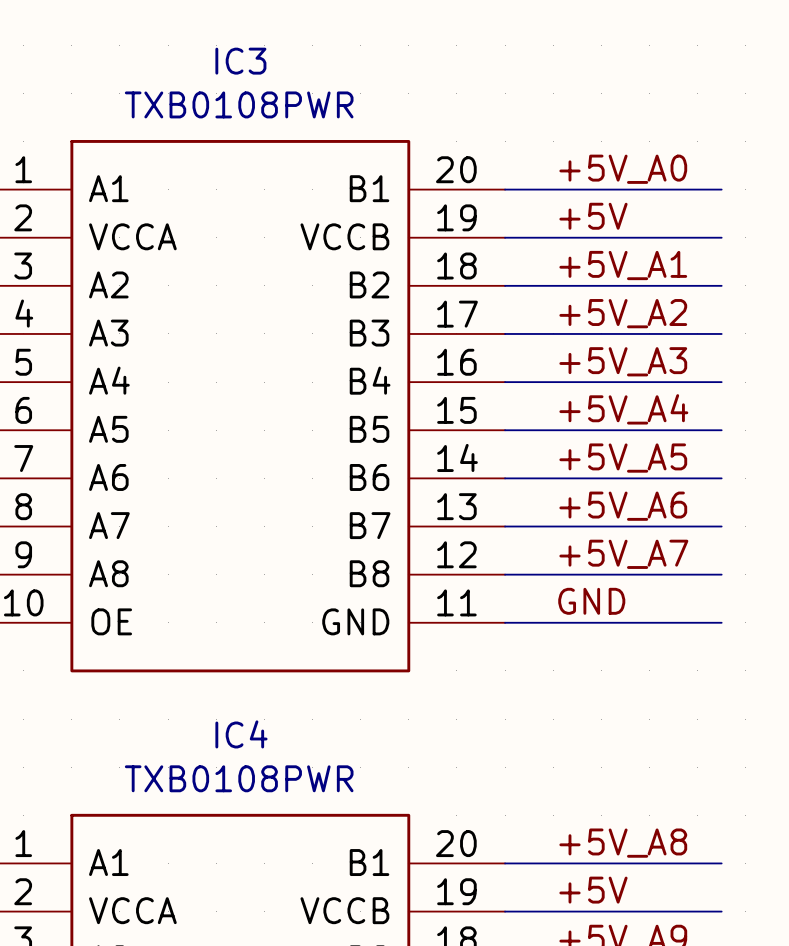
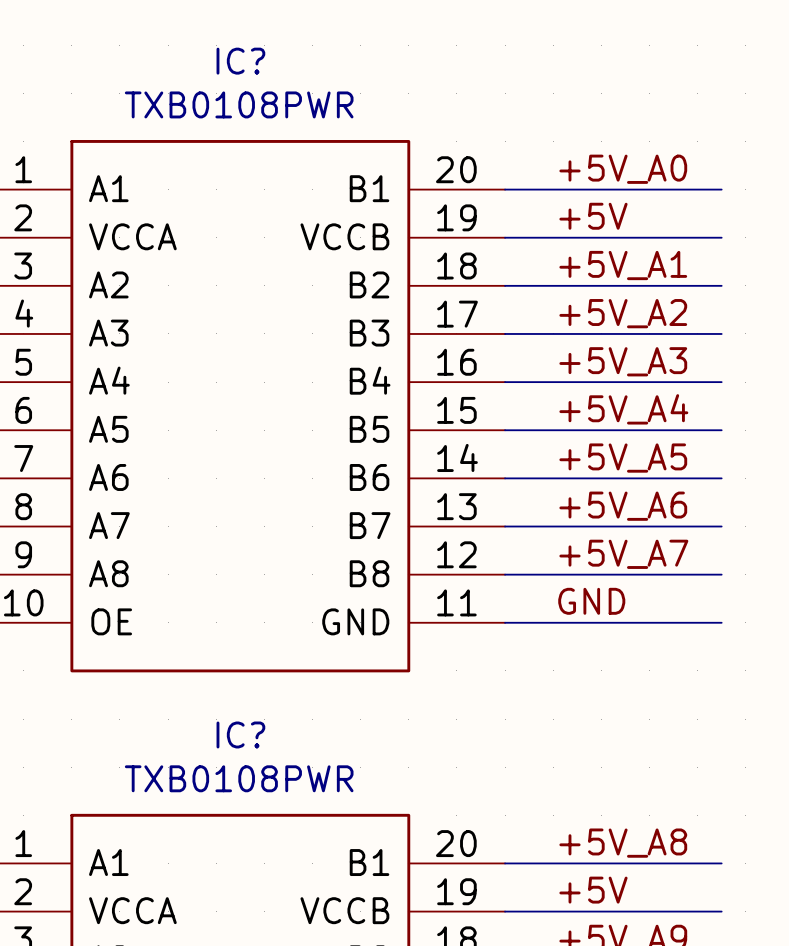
IC3 name: IC3 (240, 61) -> IC? (240, 61)
IC4 name: IC4 (241, 734) -> IC? (240, 734)

